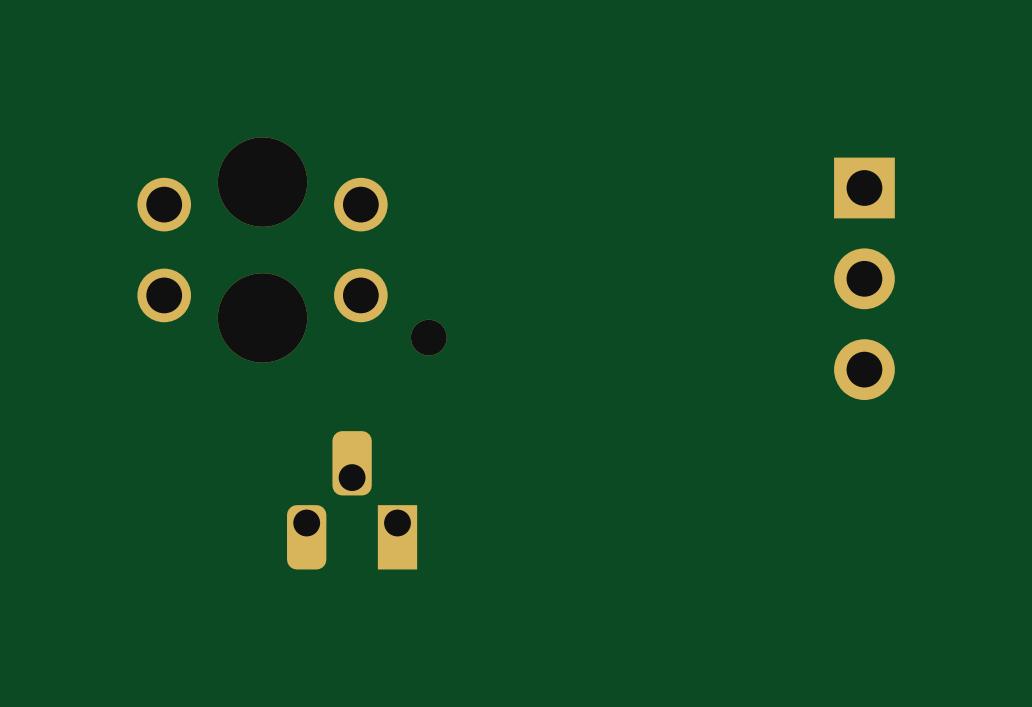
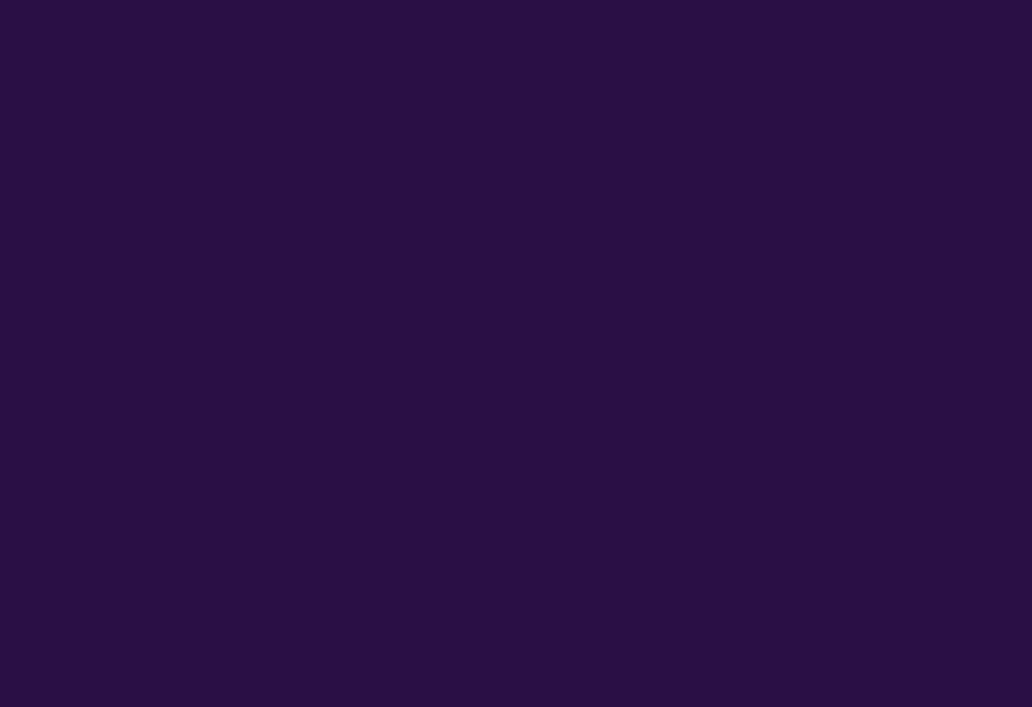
part: (292, 250) -> none
part: (864, 278) -> none
part: (352, 500) -> none

